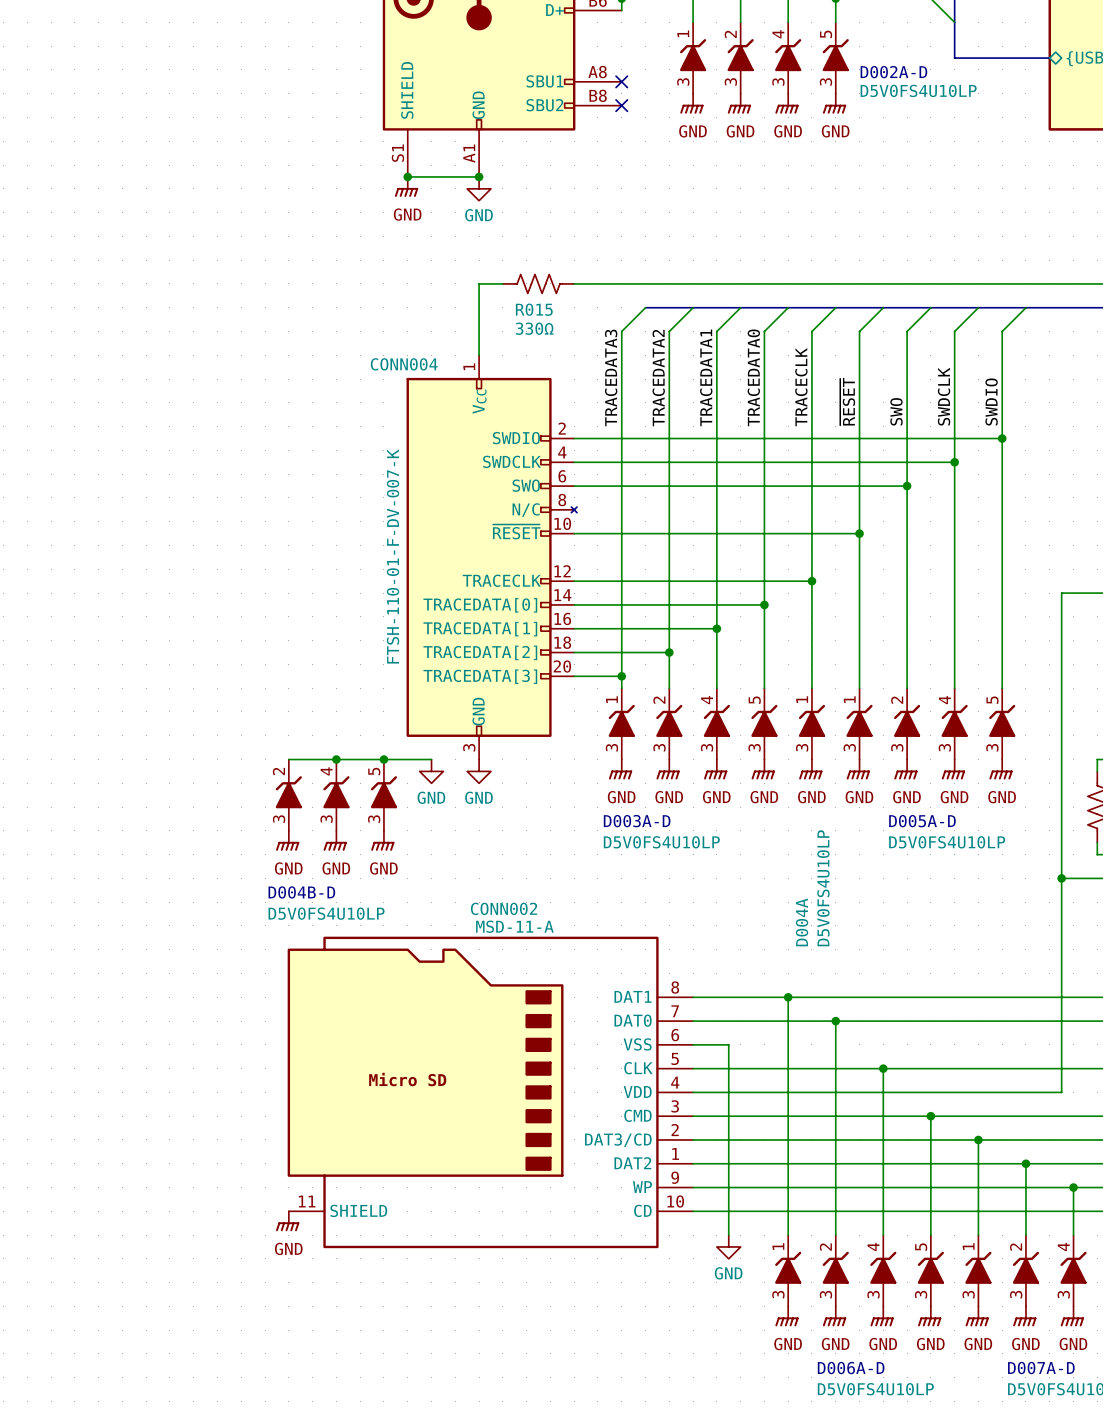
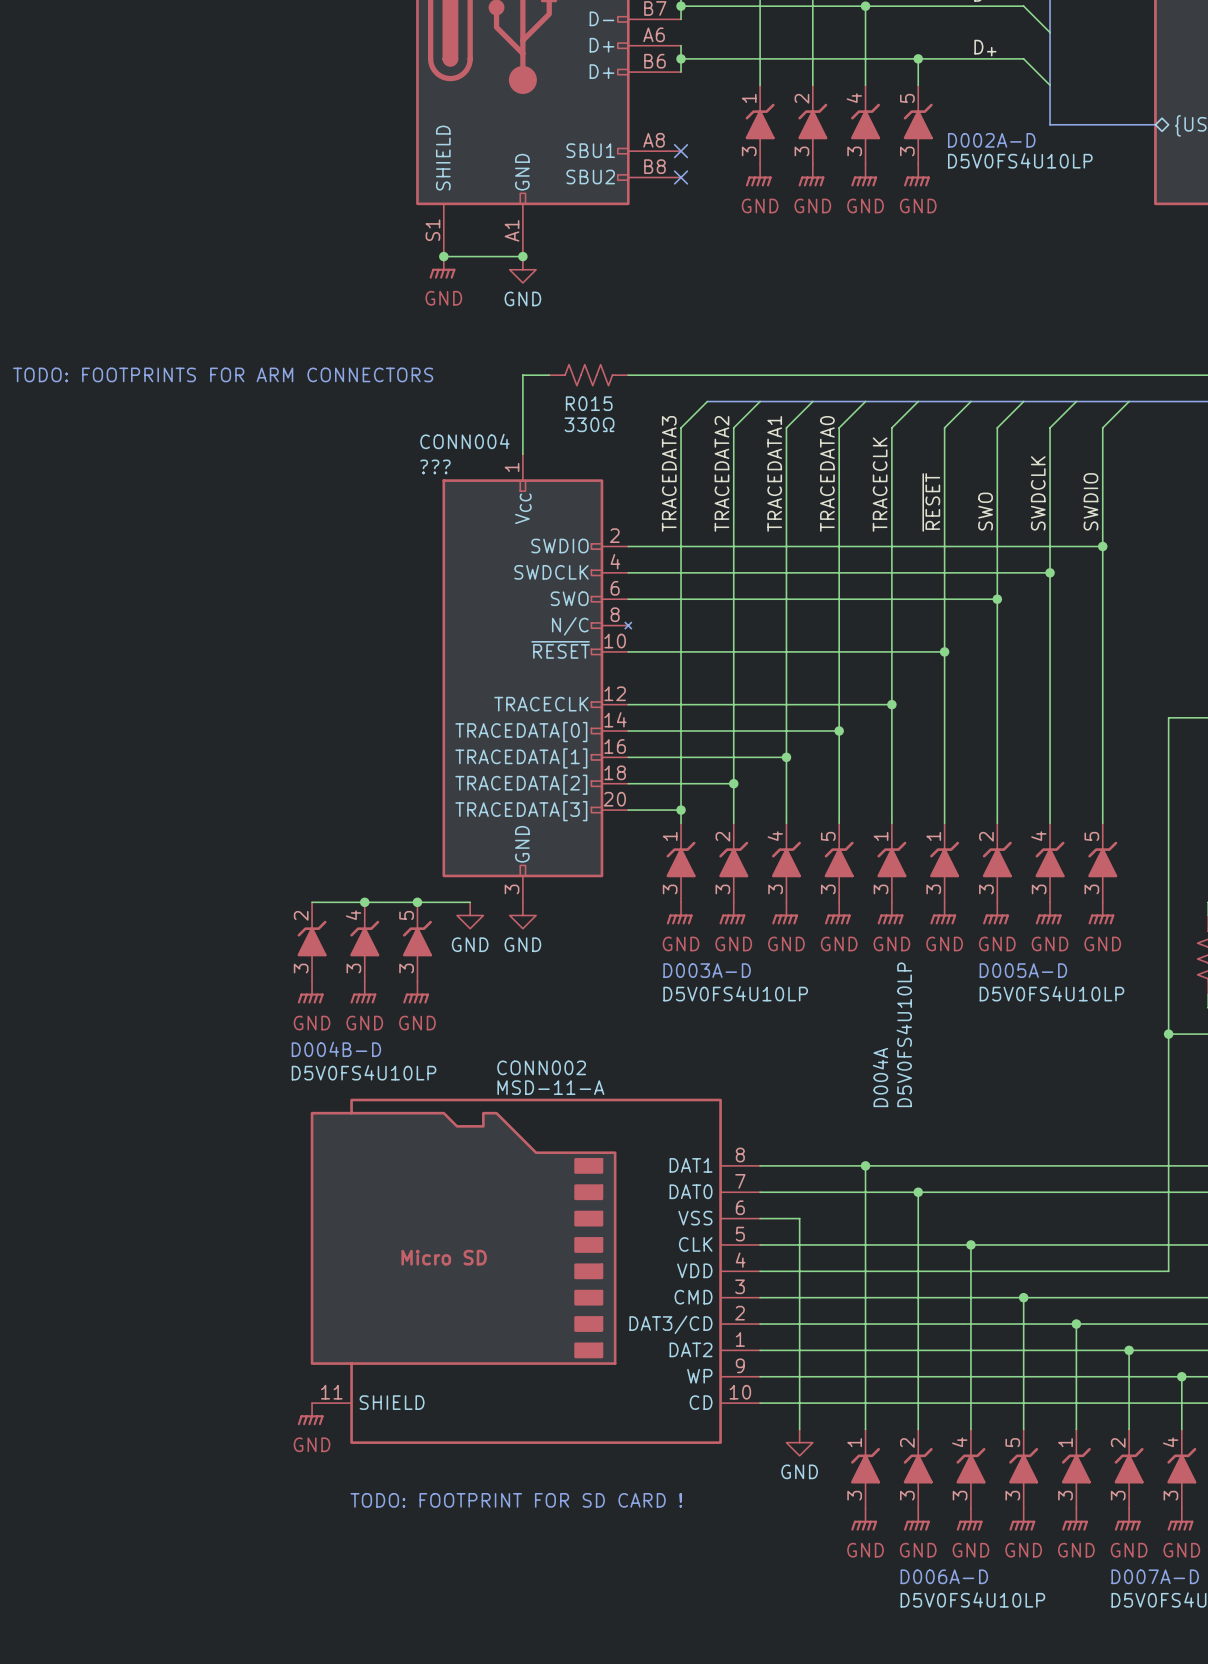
text: none -> TODO: FOOTPRINTS FOR ARM CONNECTORS (223, 374)
CONN004 name position: CONN004 (404, 364) -> CONN004 (464, 441)
CONN004 text: FTSH-110-01-F-DV-007-K (393, 556) -> ??? (435, 466)
text: none -> TODO: FOOTPRINT FOR SD CARD ! (516, 1500)

